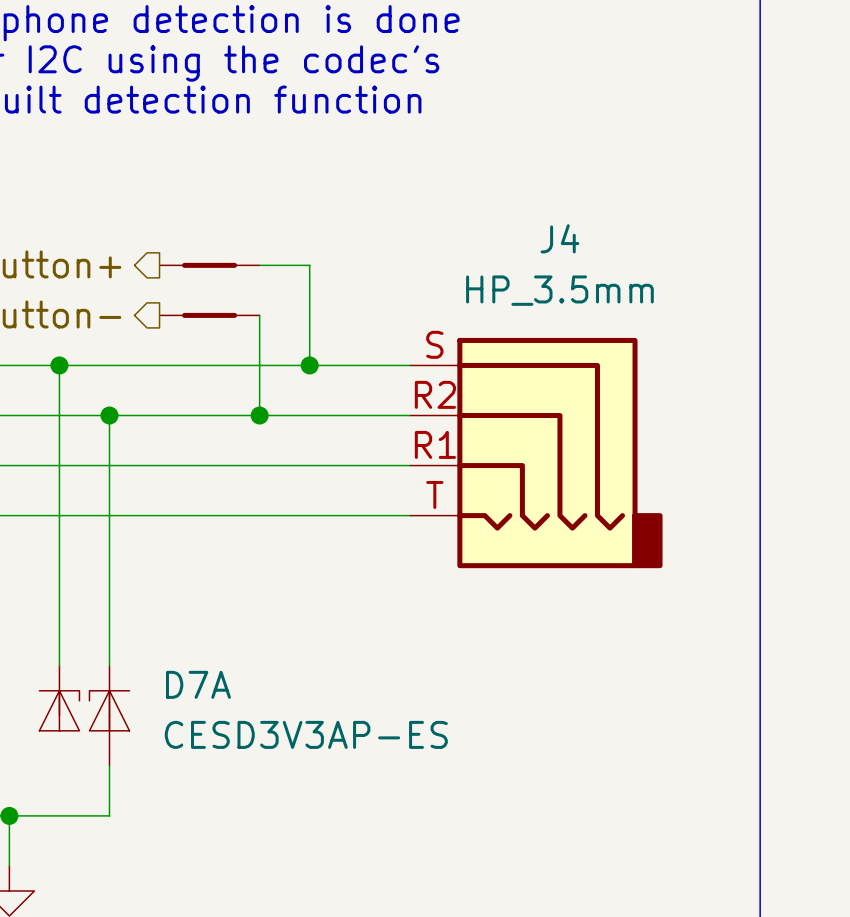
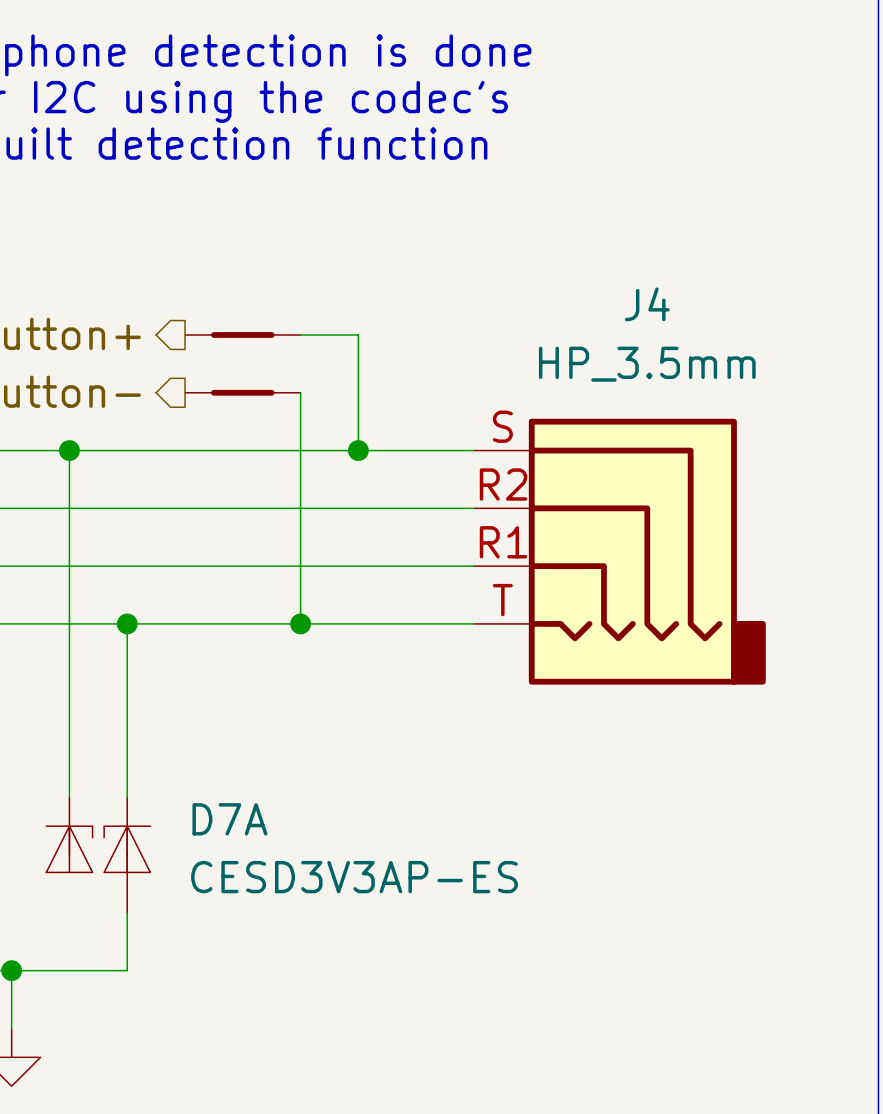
wire: (109, 415) (109, 515) -> (300, 508) (300, 623)
junction: (109, 415) -> none
junction: (259, 415) -> none
junction: none -> (127, 623)
junction: none -> (300, 623)

